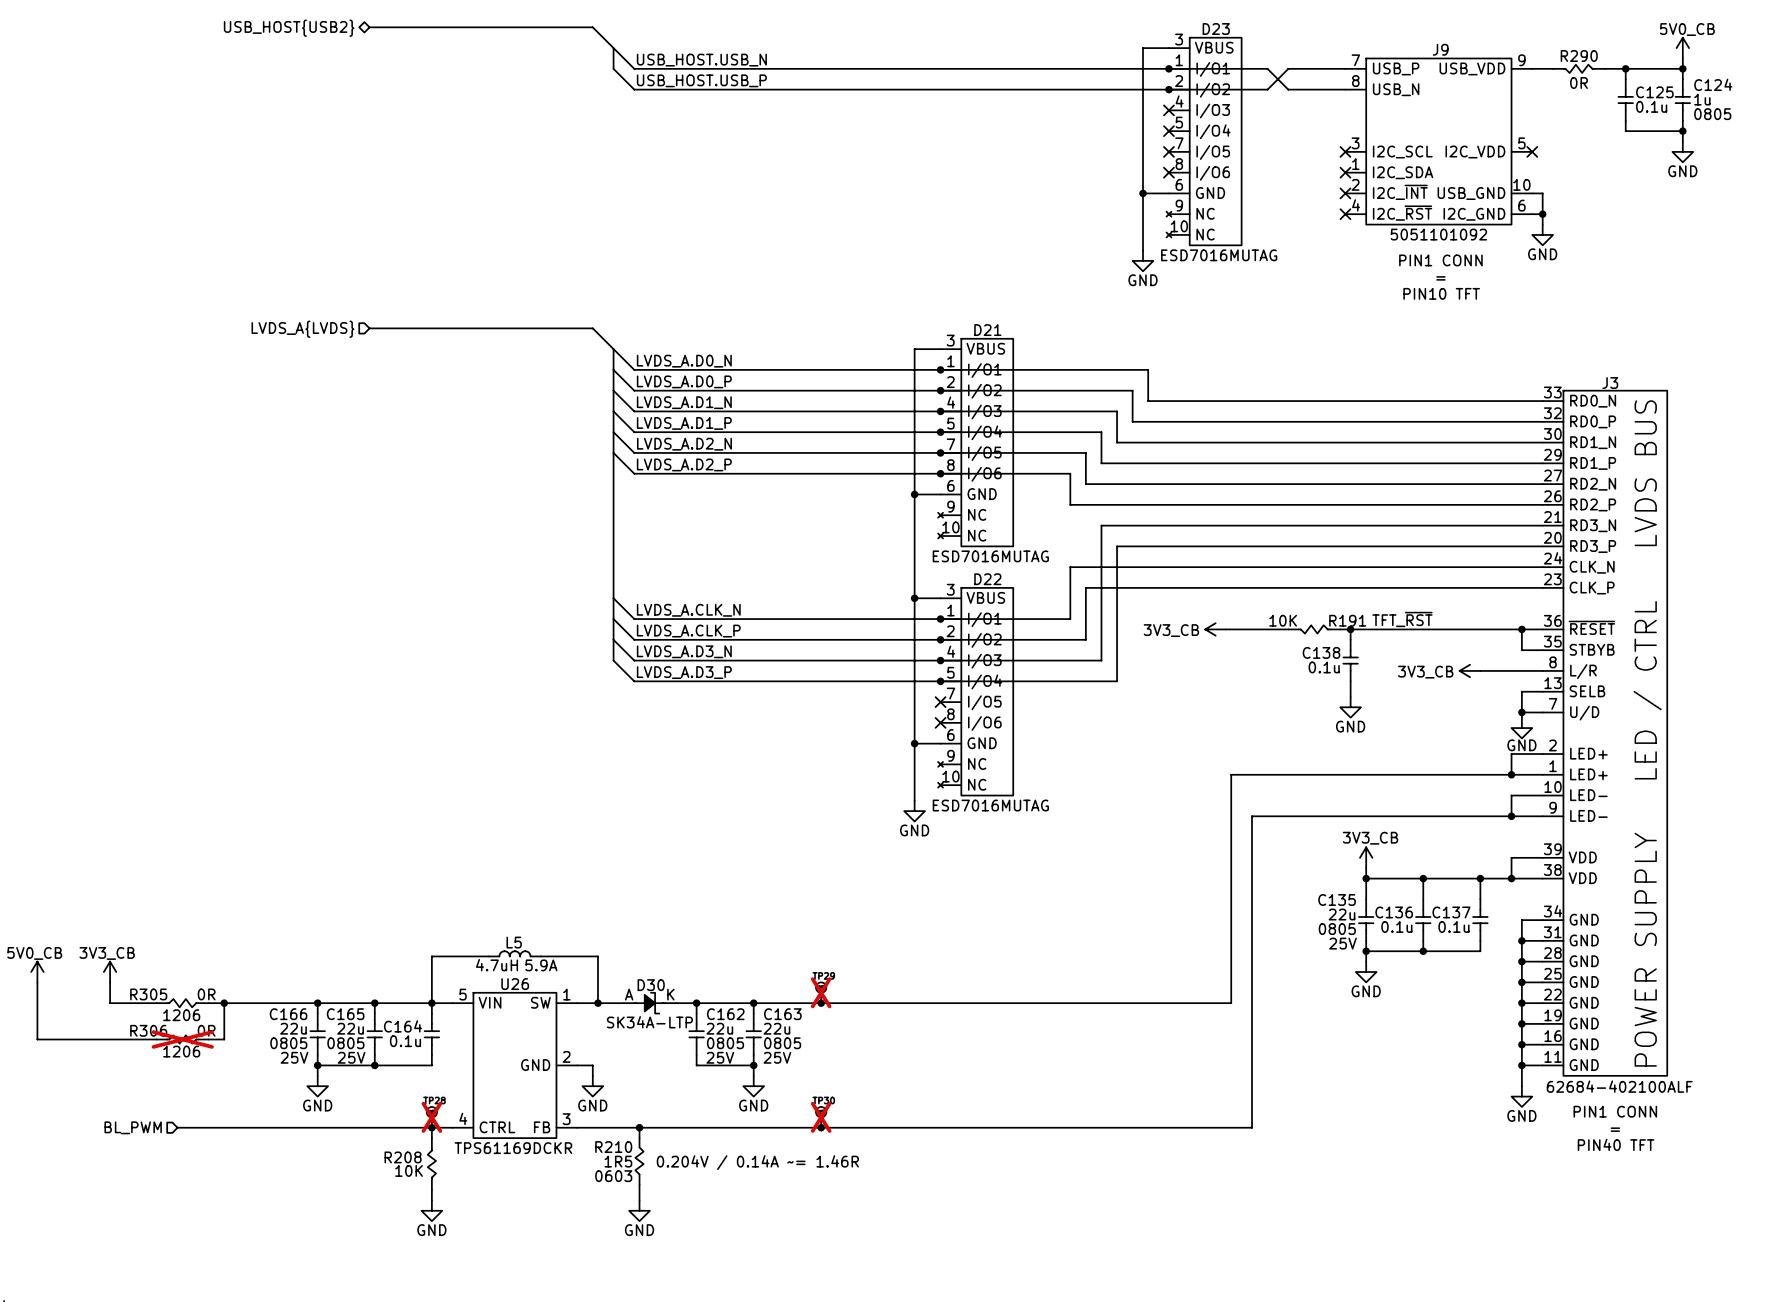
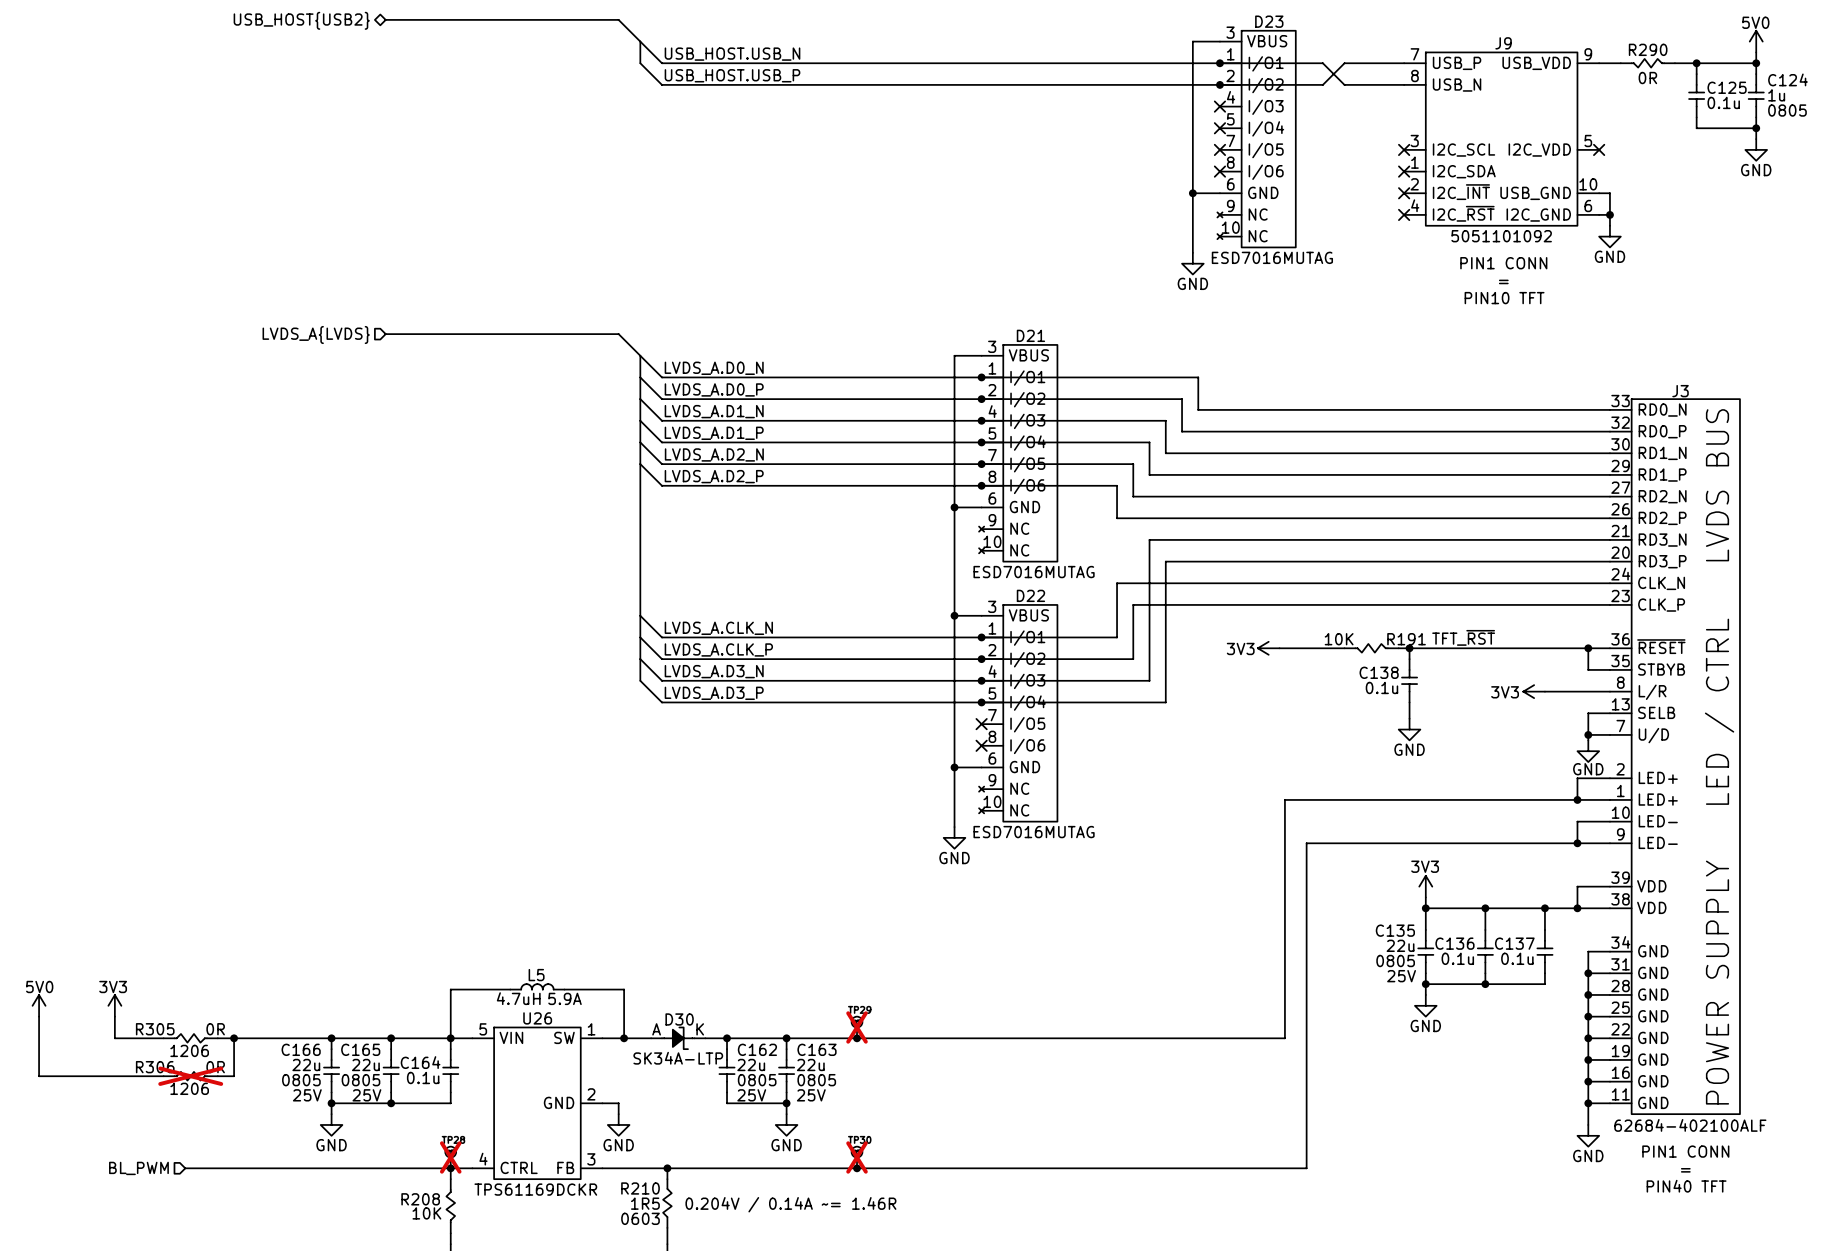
power symbol: 5V0_CB (1682, 48) -> 5V0 (1756, 41)
power symbol: 3V3_CB (1215, 629) -> 3V3 (1268, 648)
power symbol: 3V3_CB (1470, 670) -> 3V3 (1534, 691)
power symbol: 3V3_CB (1366, 857) -> 3V3 (1425, 886)
power symbol: 5V0_CB (37, 972) -> 5V0 (39, 1005)
power symbol: 3V3_CB (110, 972) -> 3V3 (114, 1005)

